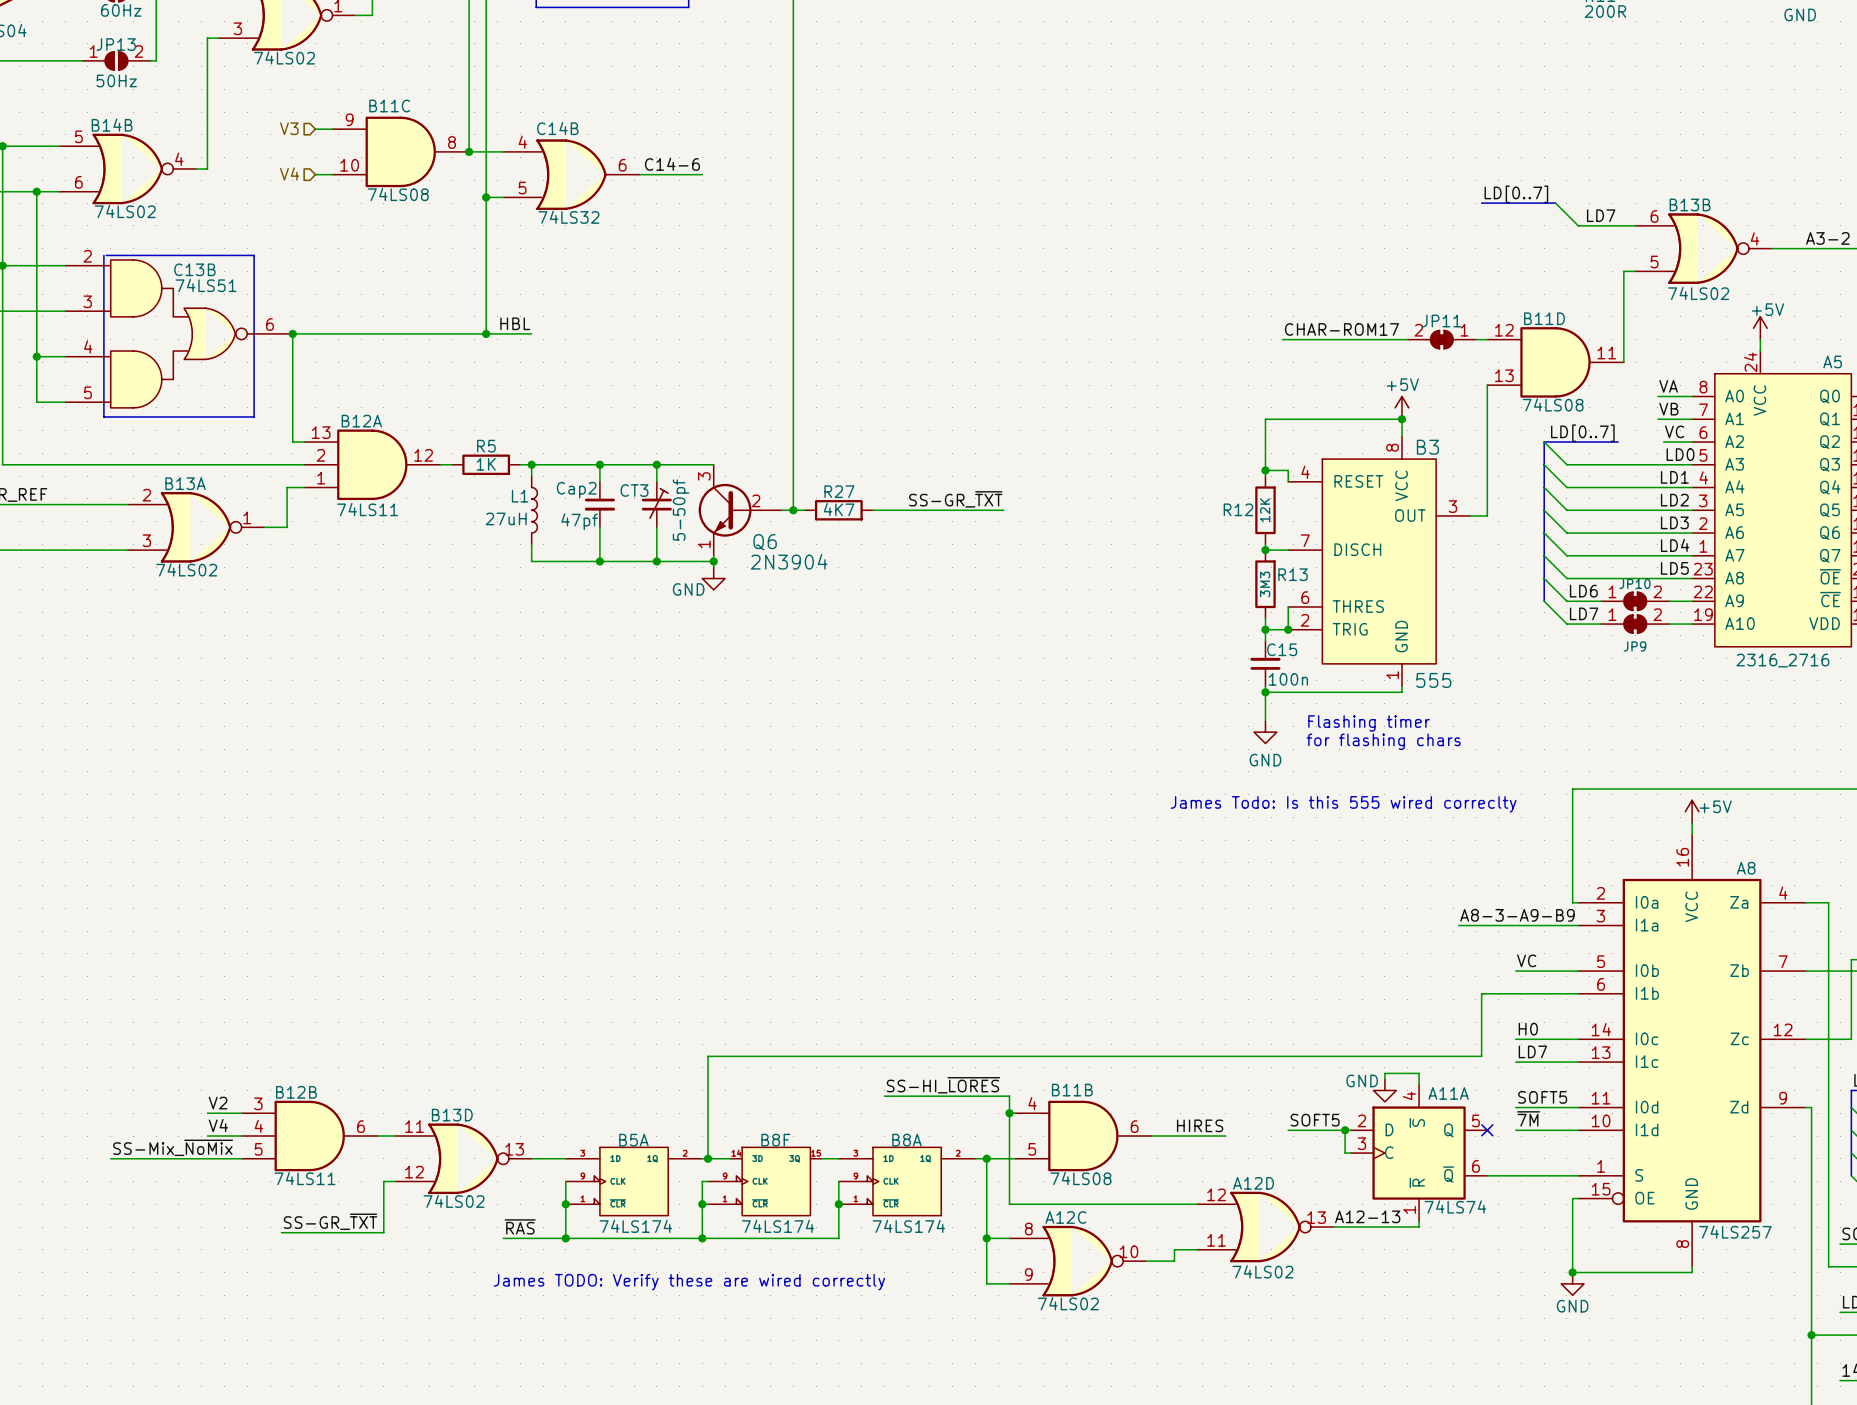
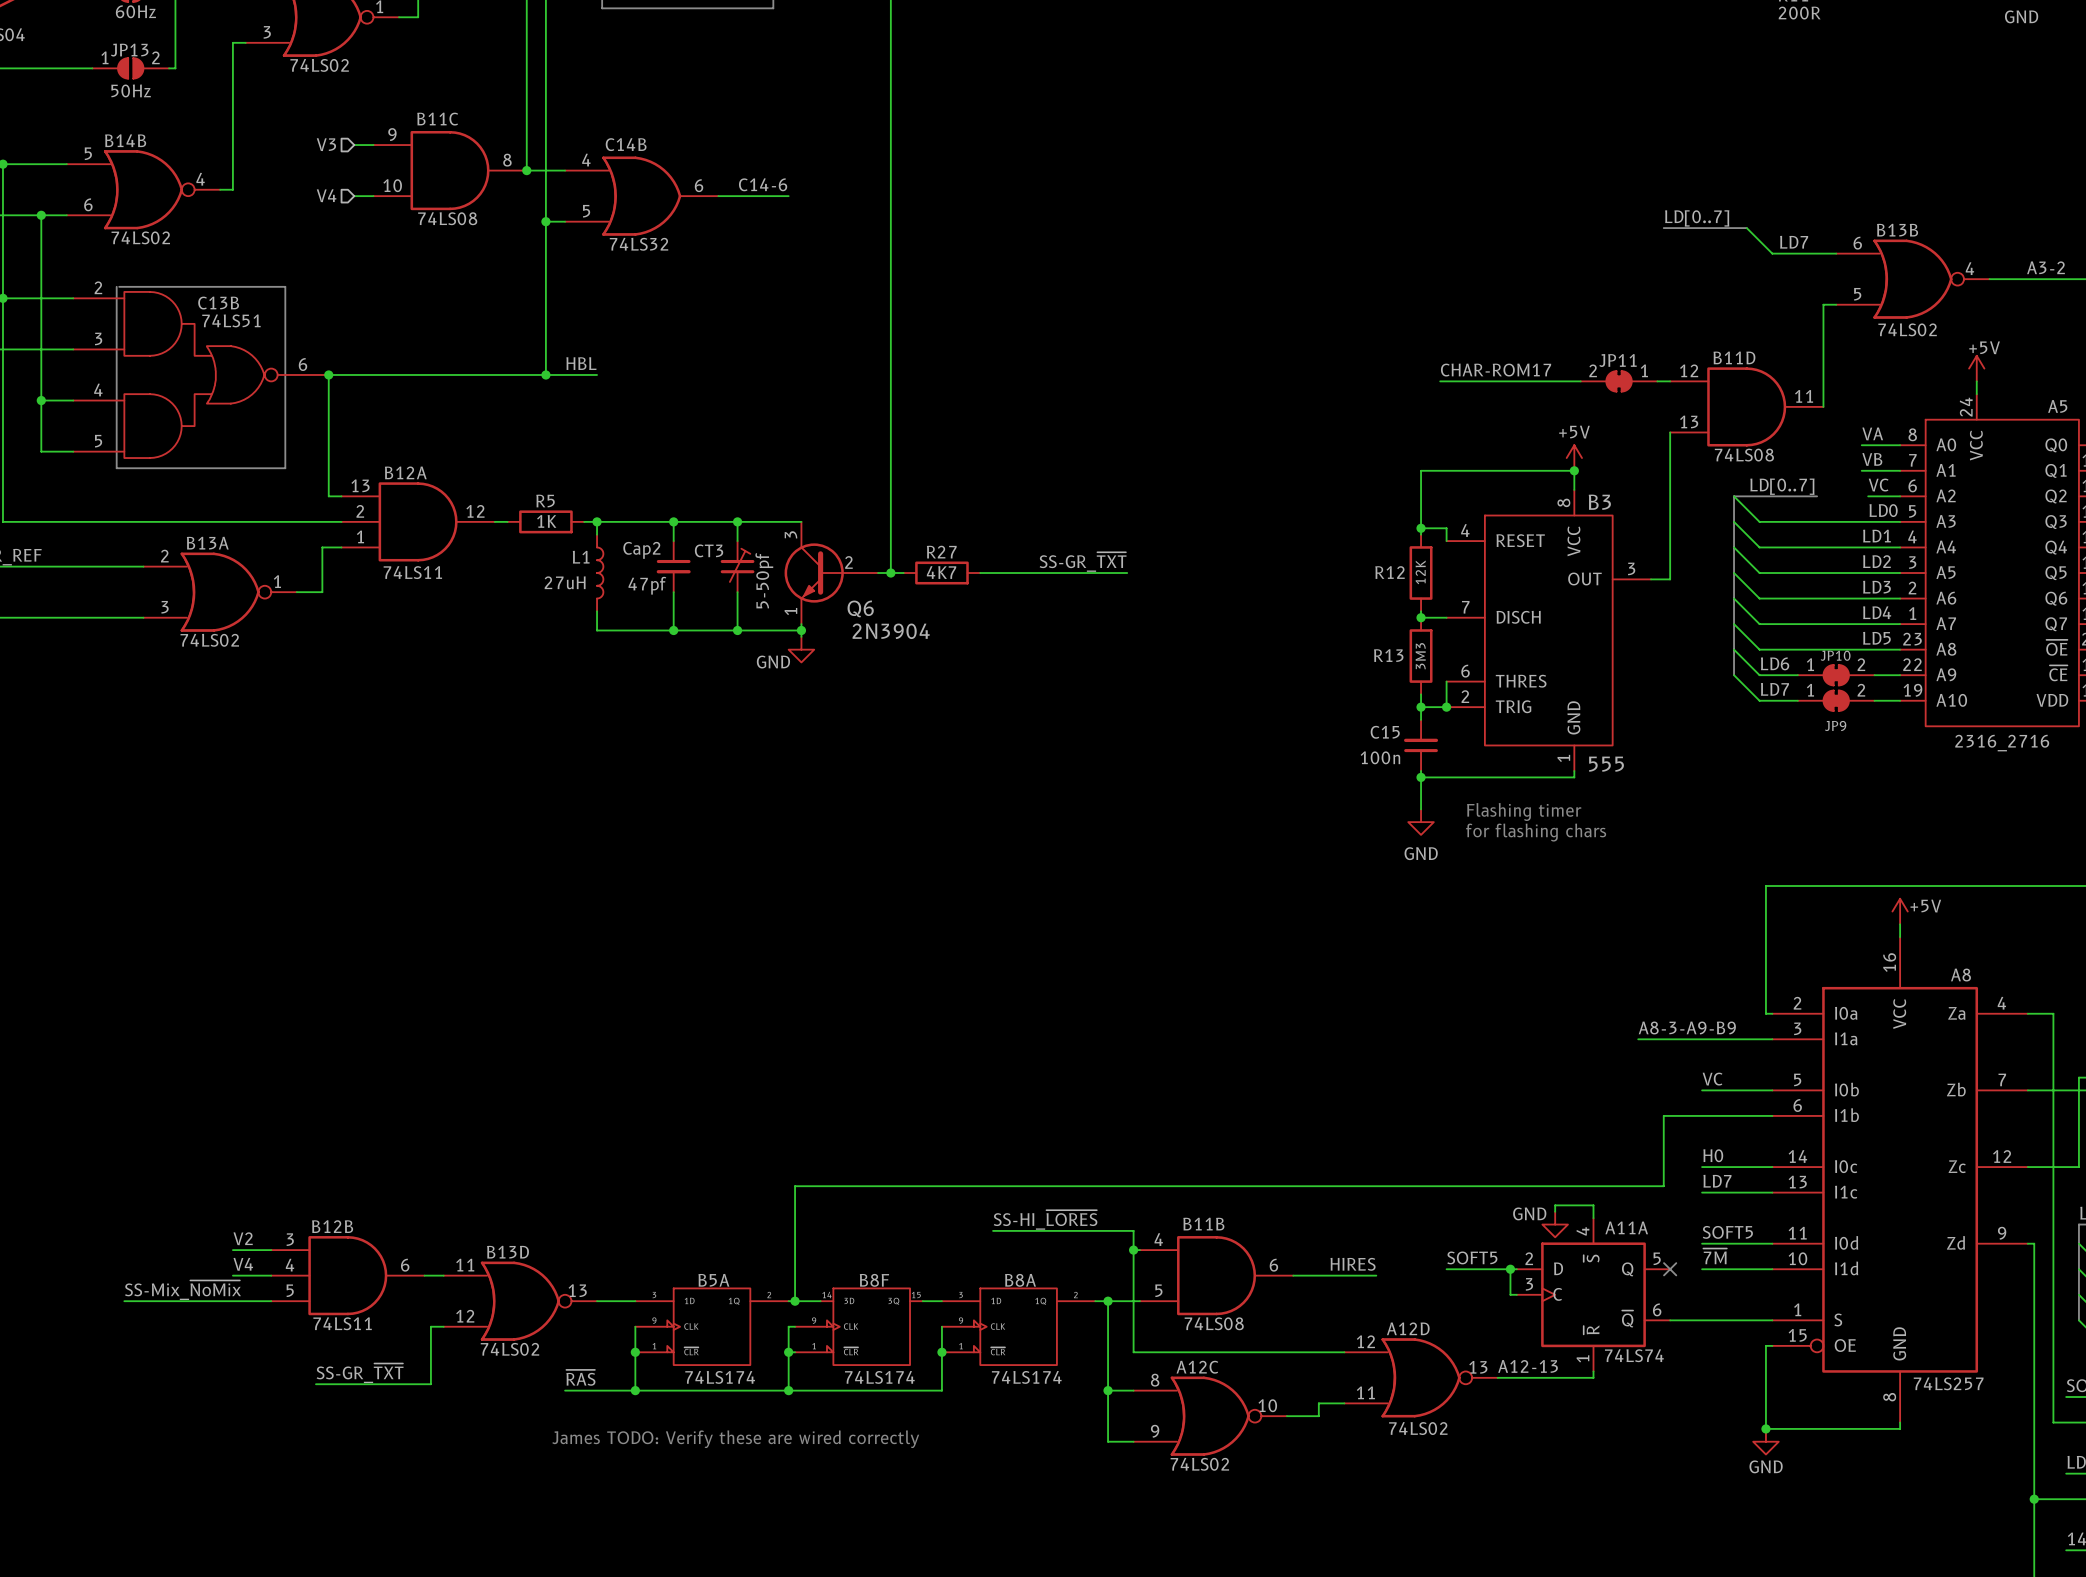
R13 name position: R13 (1293, 574) -> R13 (1388, 655)
C15 name position: C15 (1282, 649) -> C15 (1385, 732)
C15 value position: 100n (1288, 679) -> 100n (1380, 757)
text: James Todo: Is this 555 wired correclty (1343, 804) -> none

